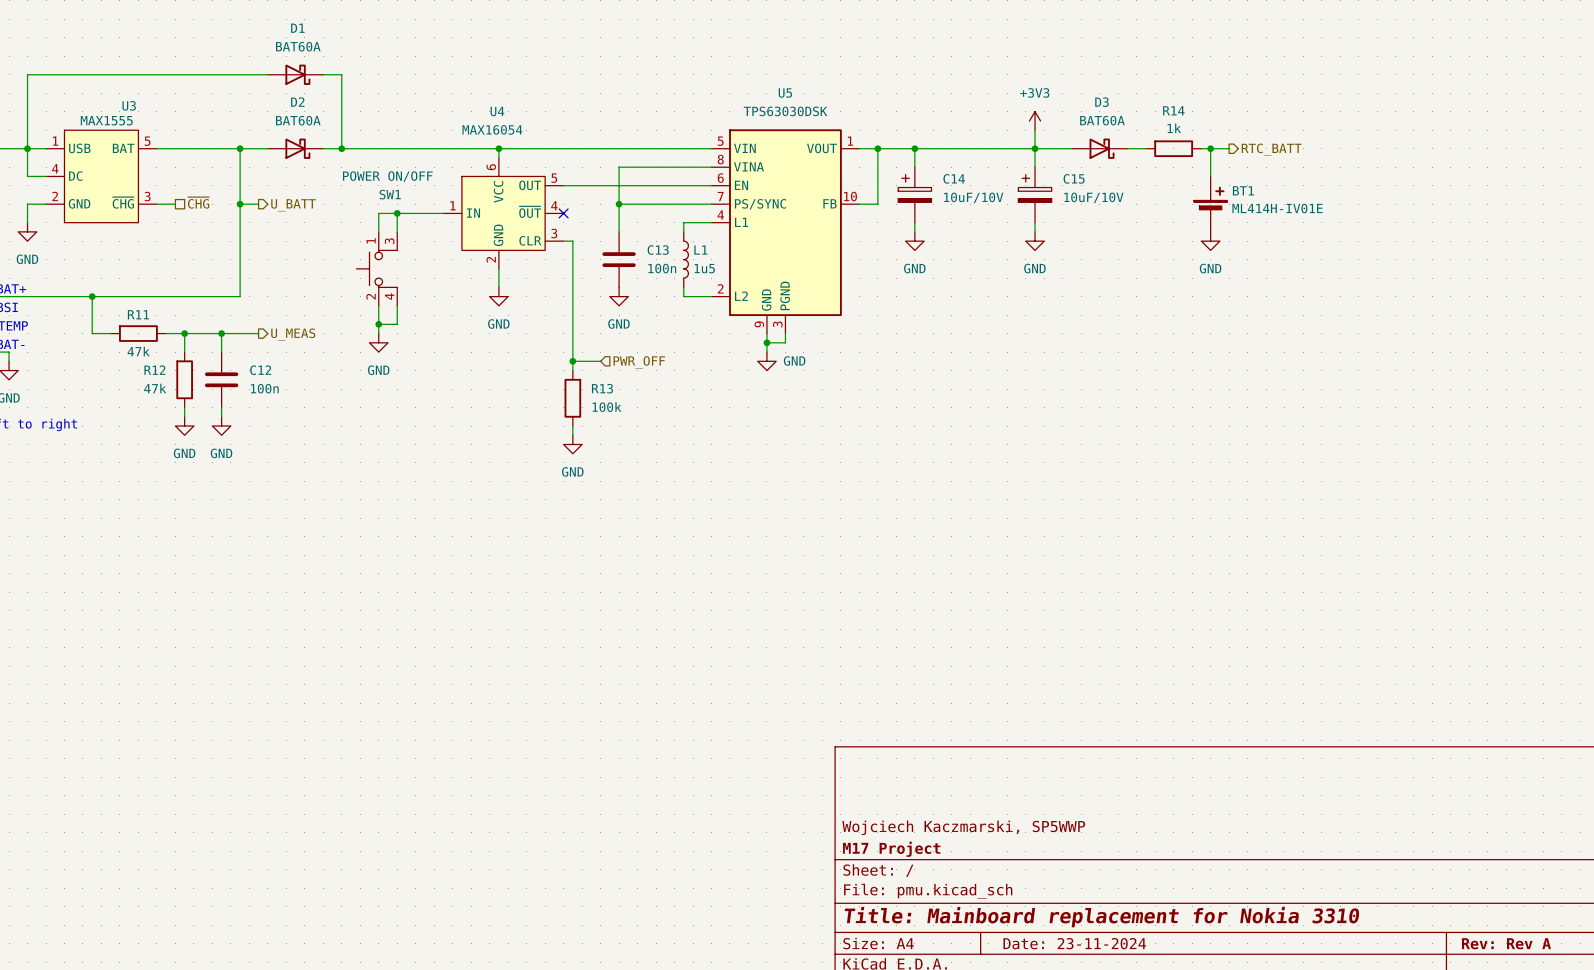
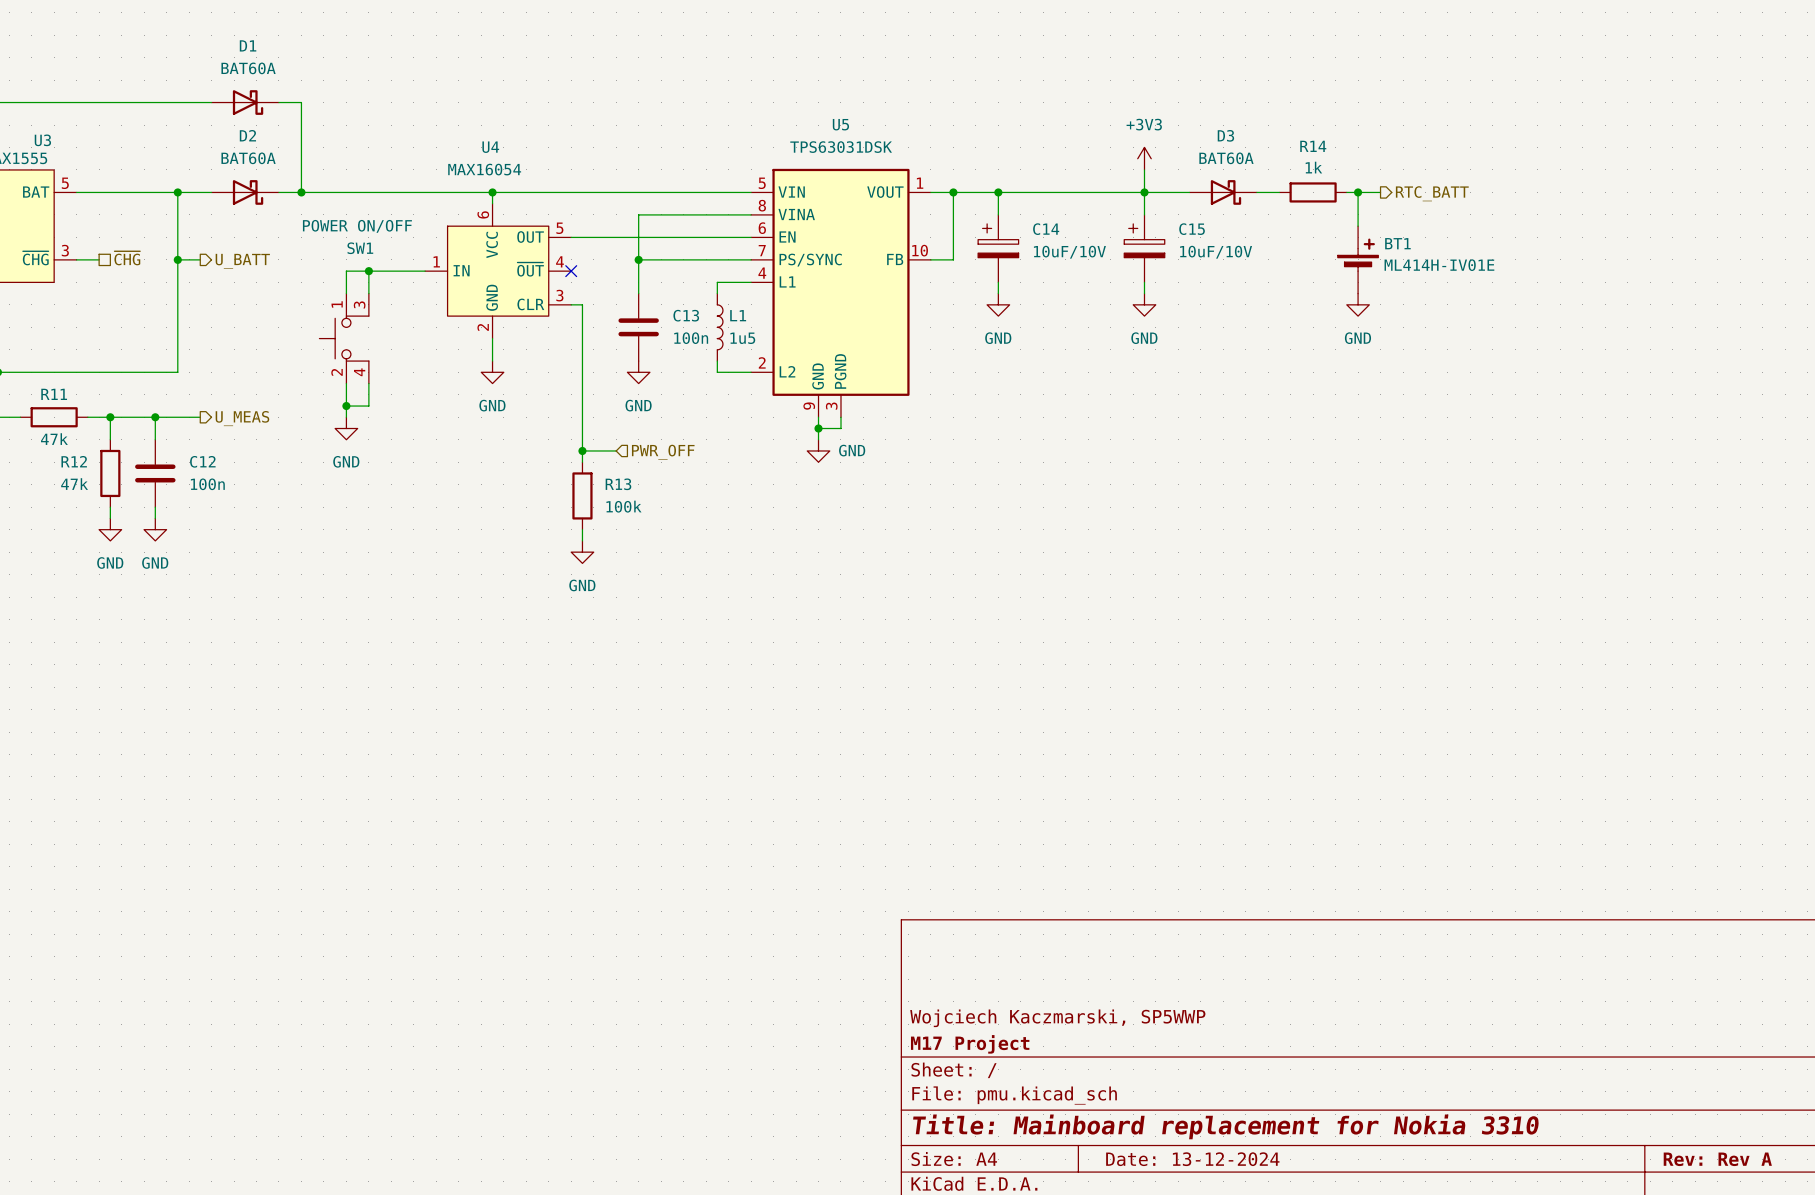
U5 value: TPS63030DSK (785, 111) -> TPS63031DSK (841, 147)
title block: Date: 23-11-2024 (1074, 943) -> Date: 13-12-2024 (1192, 1159)

